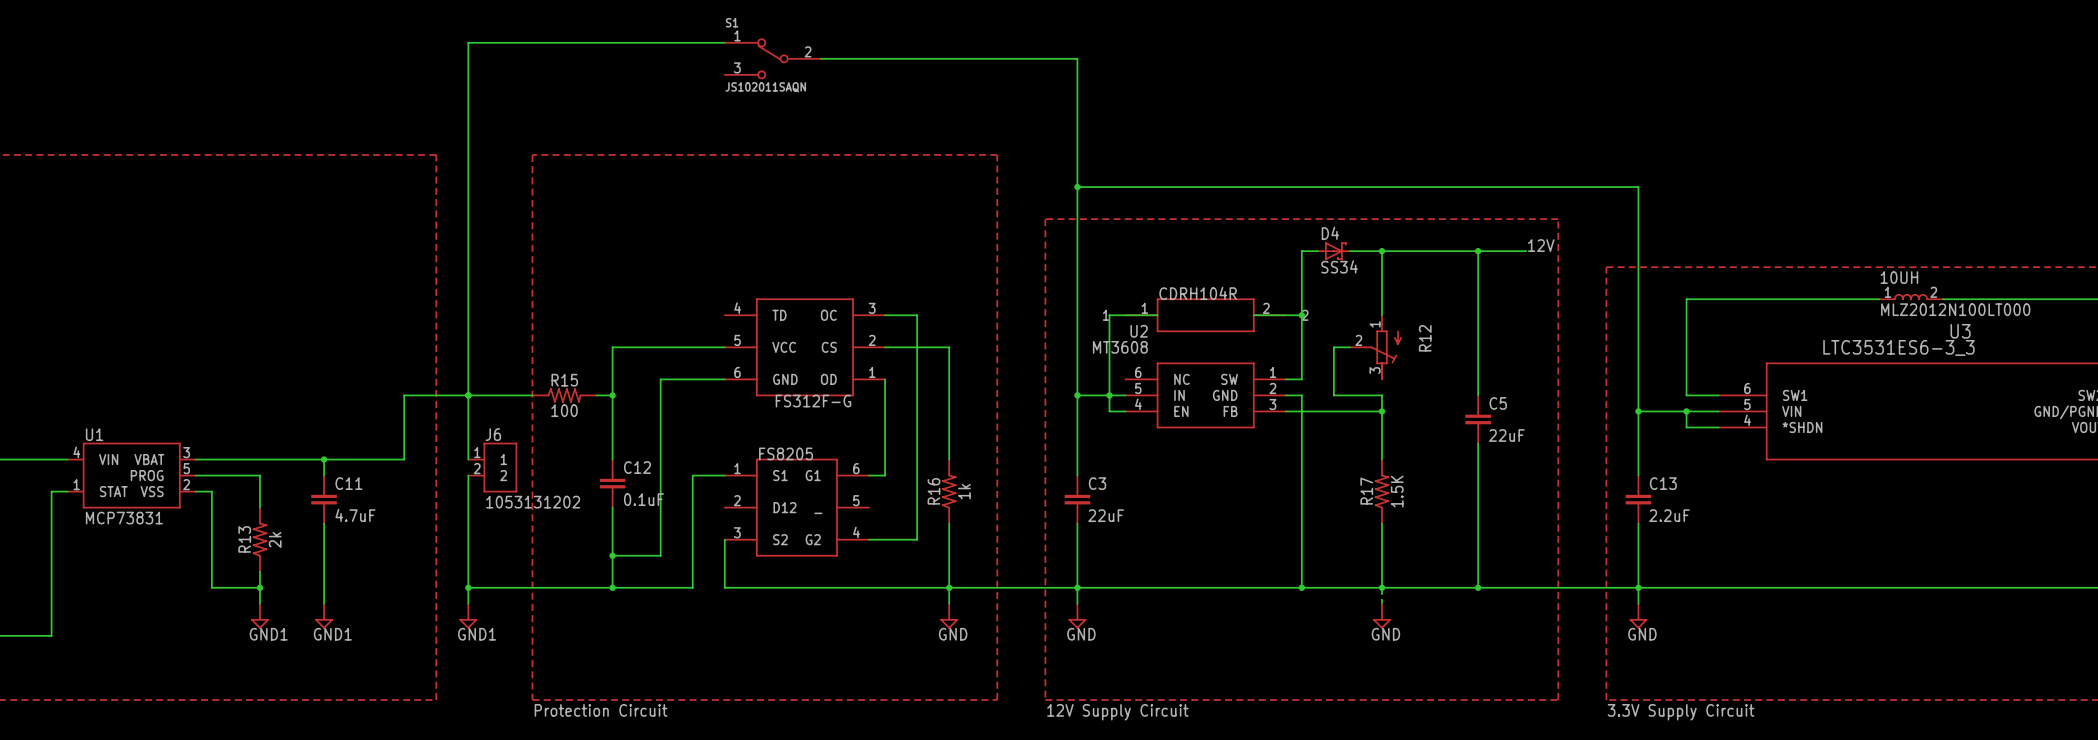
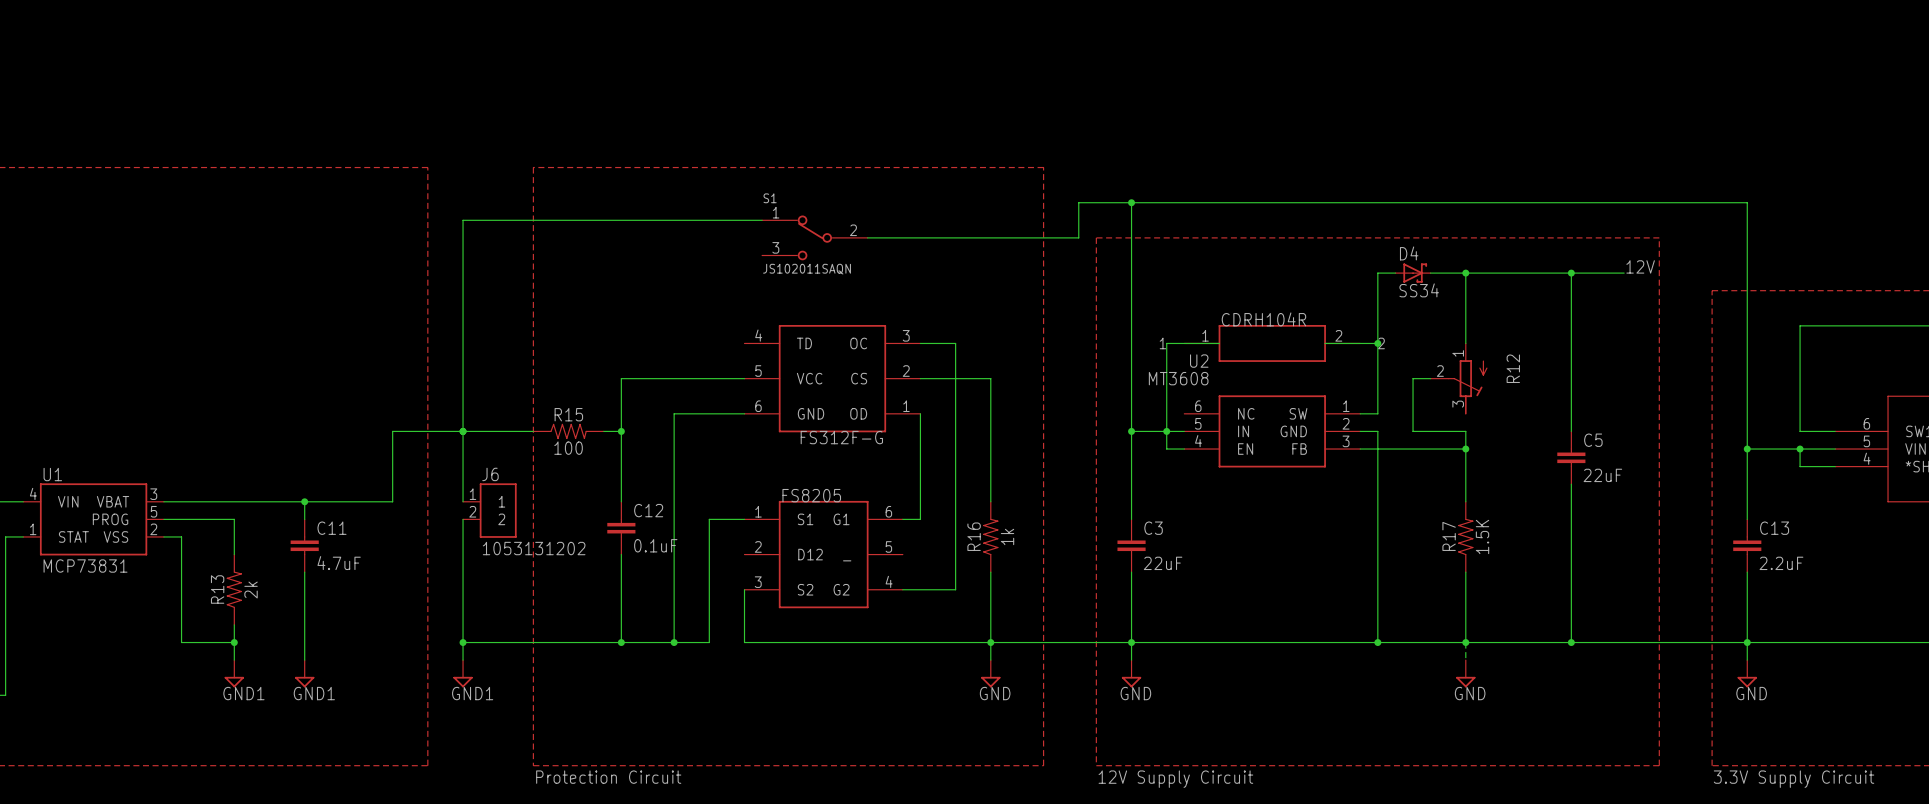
wire: (724, 42) (468, 42) (468, 203) -> (762, 220) (463, 220)
S1 position: (772, 58) -> (814, 237)
wire: (820, 58) (1077, 58) (1077, 187) -> (867, 237) (1078, 237) (1078, 202) (1131, 202)
wire: (612, 555) (660, 555) -> (674, 642) (674, 607)
junction: (612, 555) -> none
junction: none -> (674, 642)

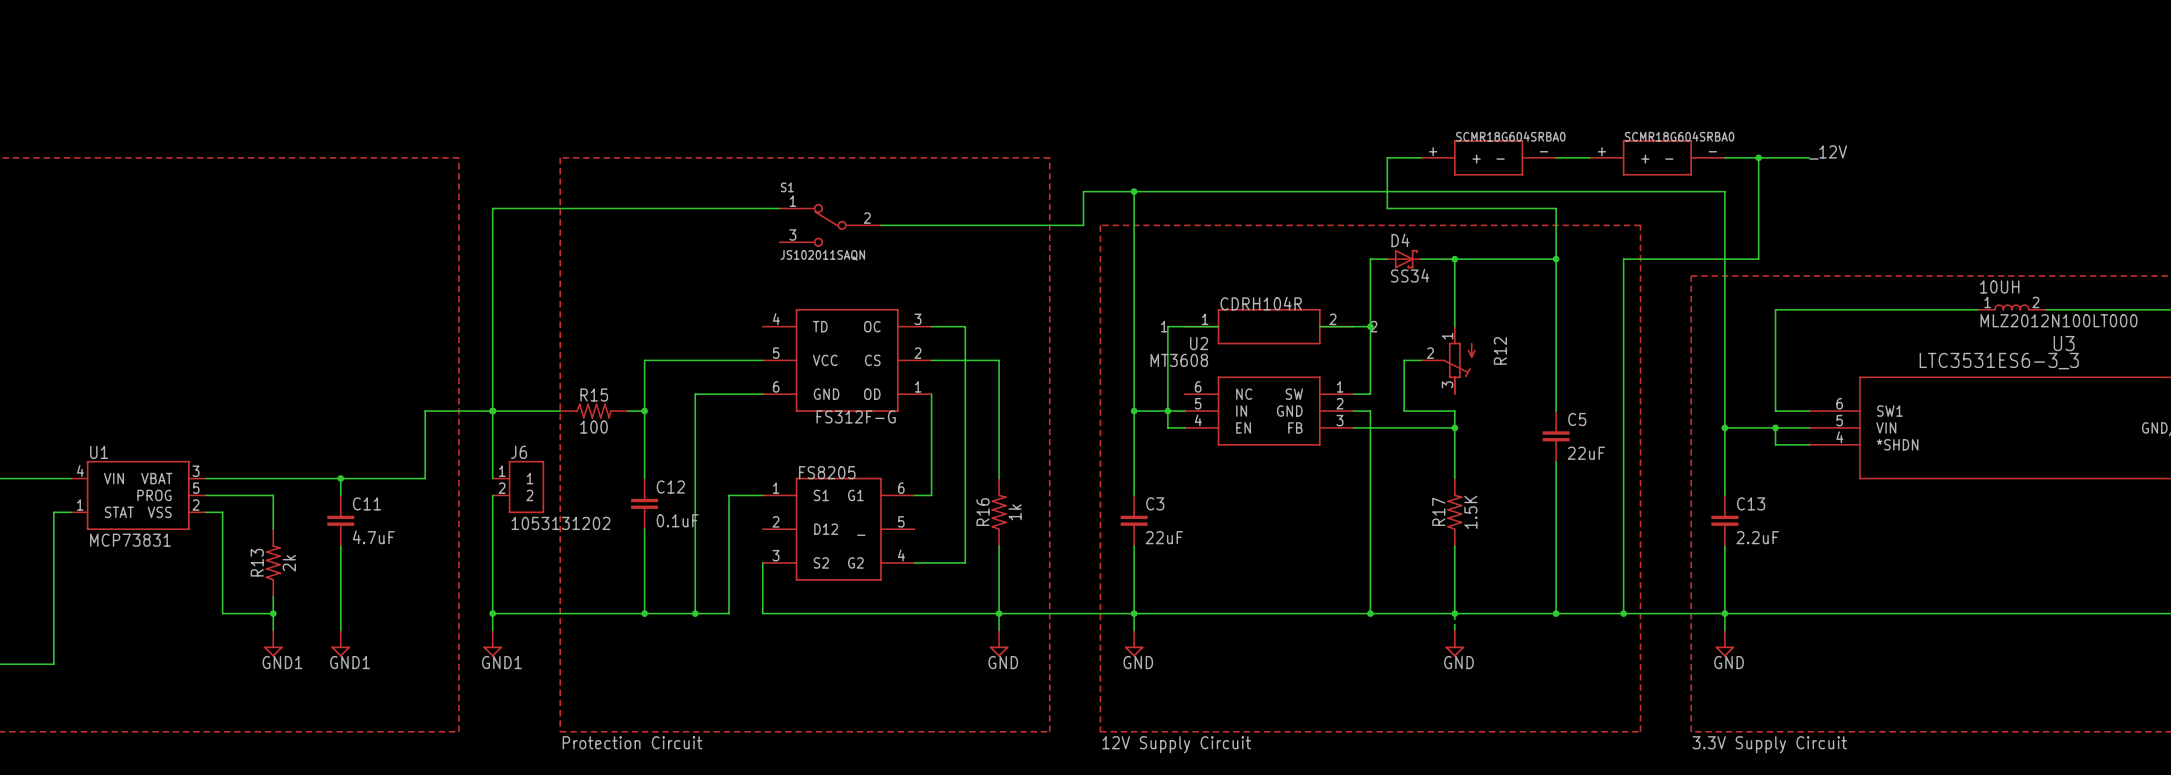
label: none -> _12V (1828, 152)
part: none -> (1488, 157)
wire: none -> (1556, 157) (1589, 157)
part: none -> (1657, 157)
wire: none -> (1724, 157) (1809, 157)
wire: none -> (1758, 157) (1758, 259) (1623, 259) (1623, 613)
junction: none -> (1758, 157)
label: 12V (1640, 266) -> none
wire: (1571, 273) (1624, 273) -> (1556, 259) (1556, 208) (1387, 208) (1387, 157) (1421, 157)
junction: none -> (1623, 613)

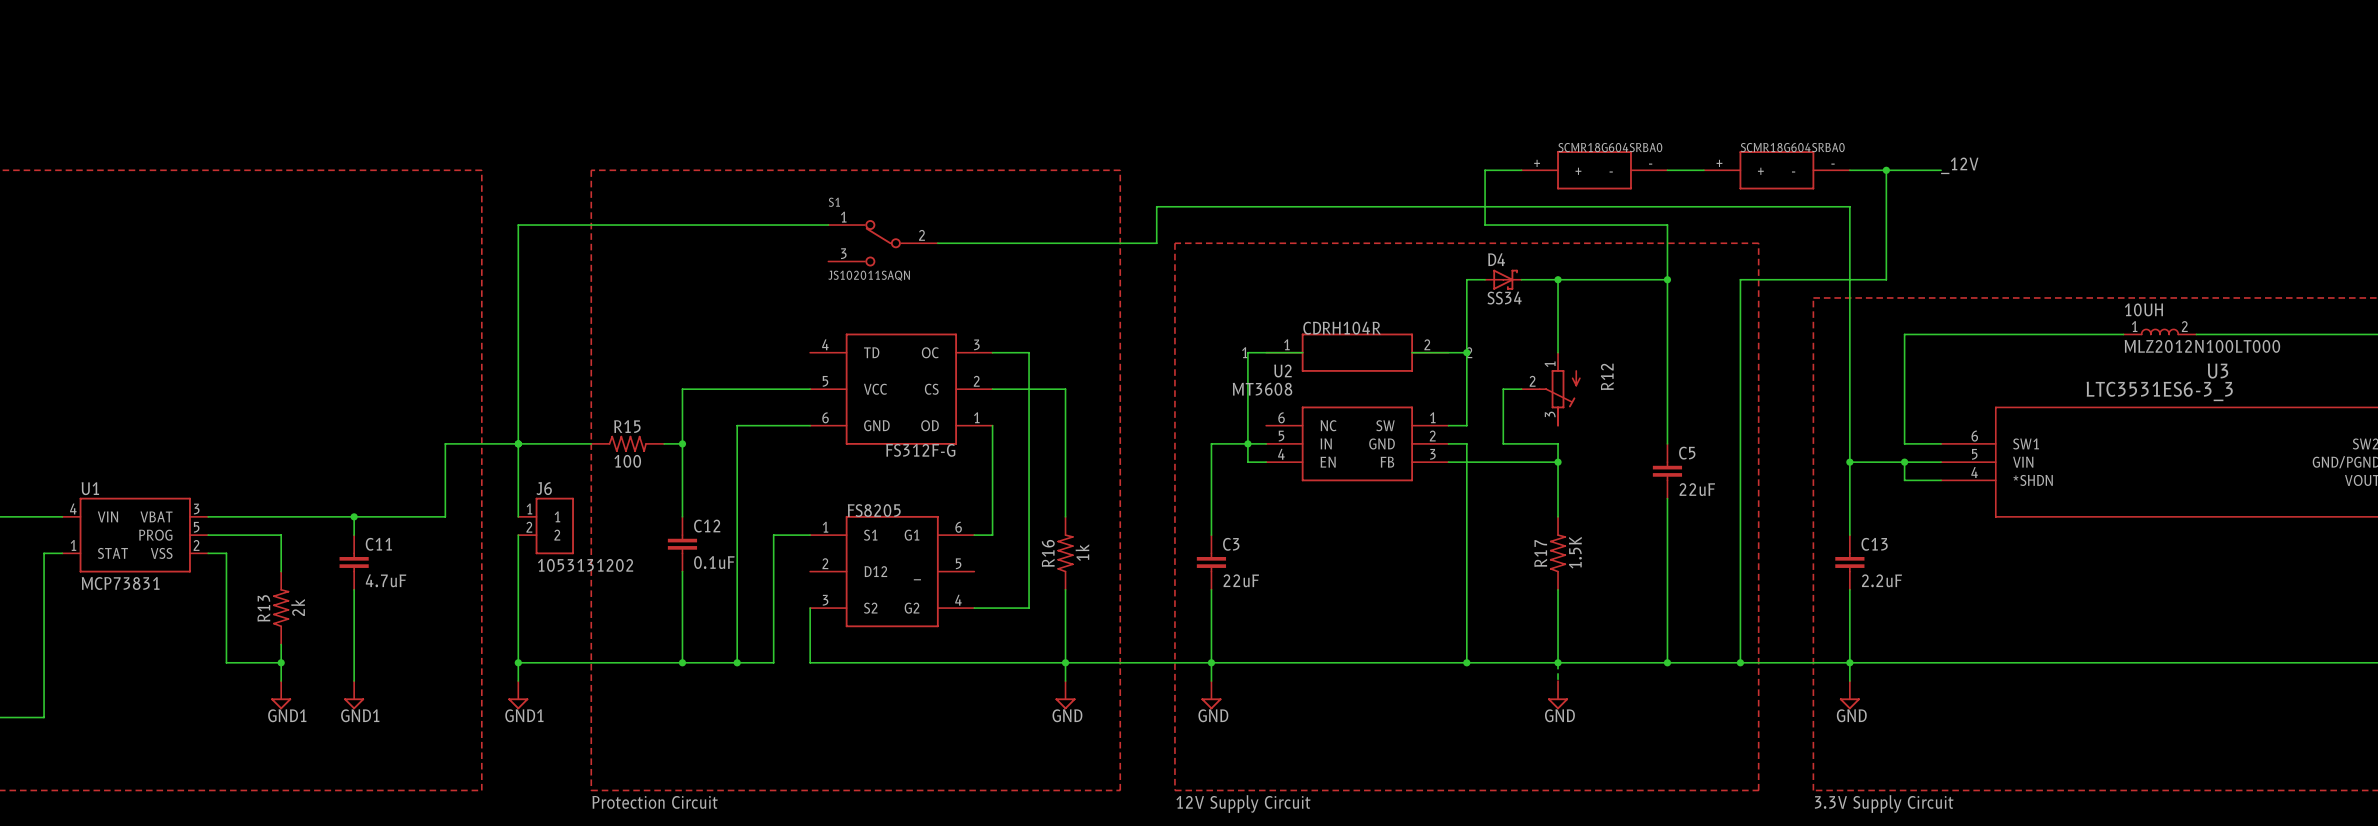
wire: (1134, 191) (1134, 411) -> none
junction: (1134, 191) -> none
junction: (1134, 411) -> none

